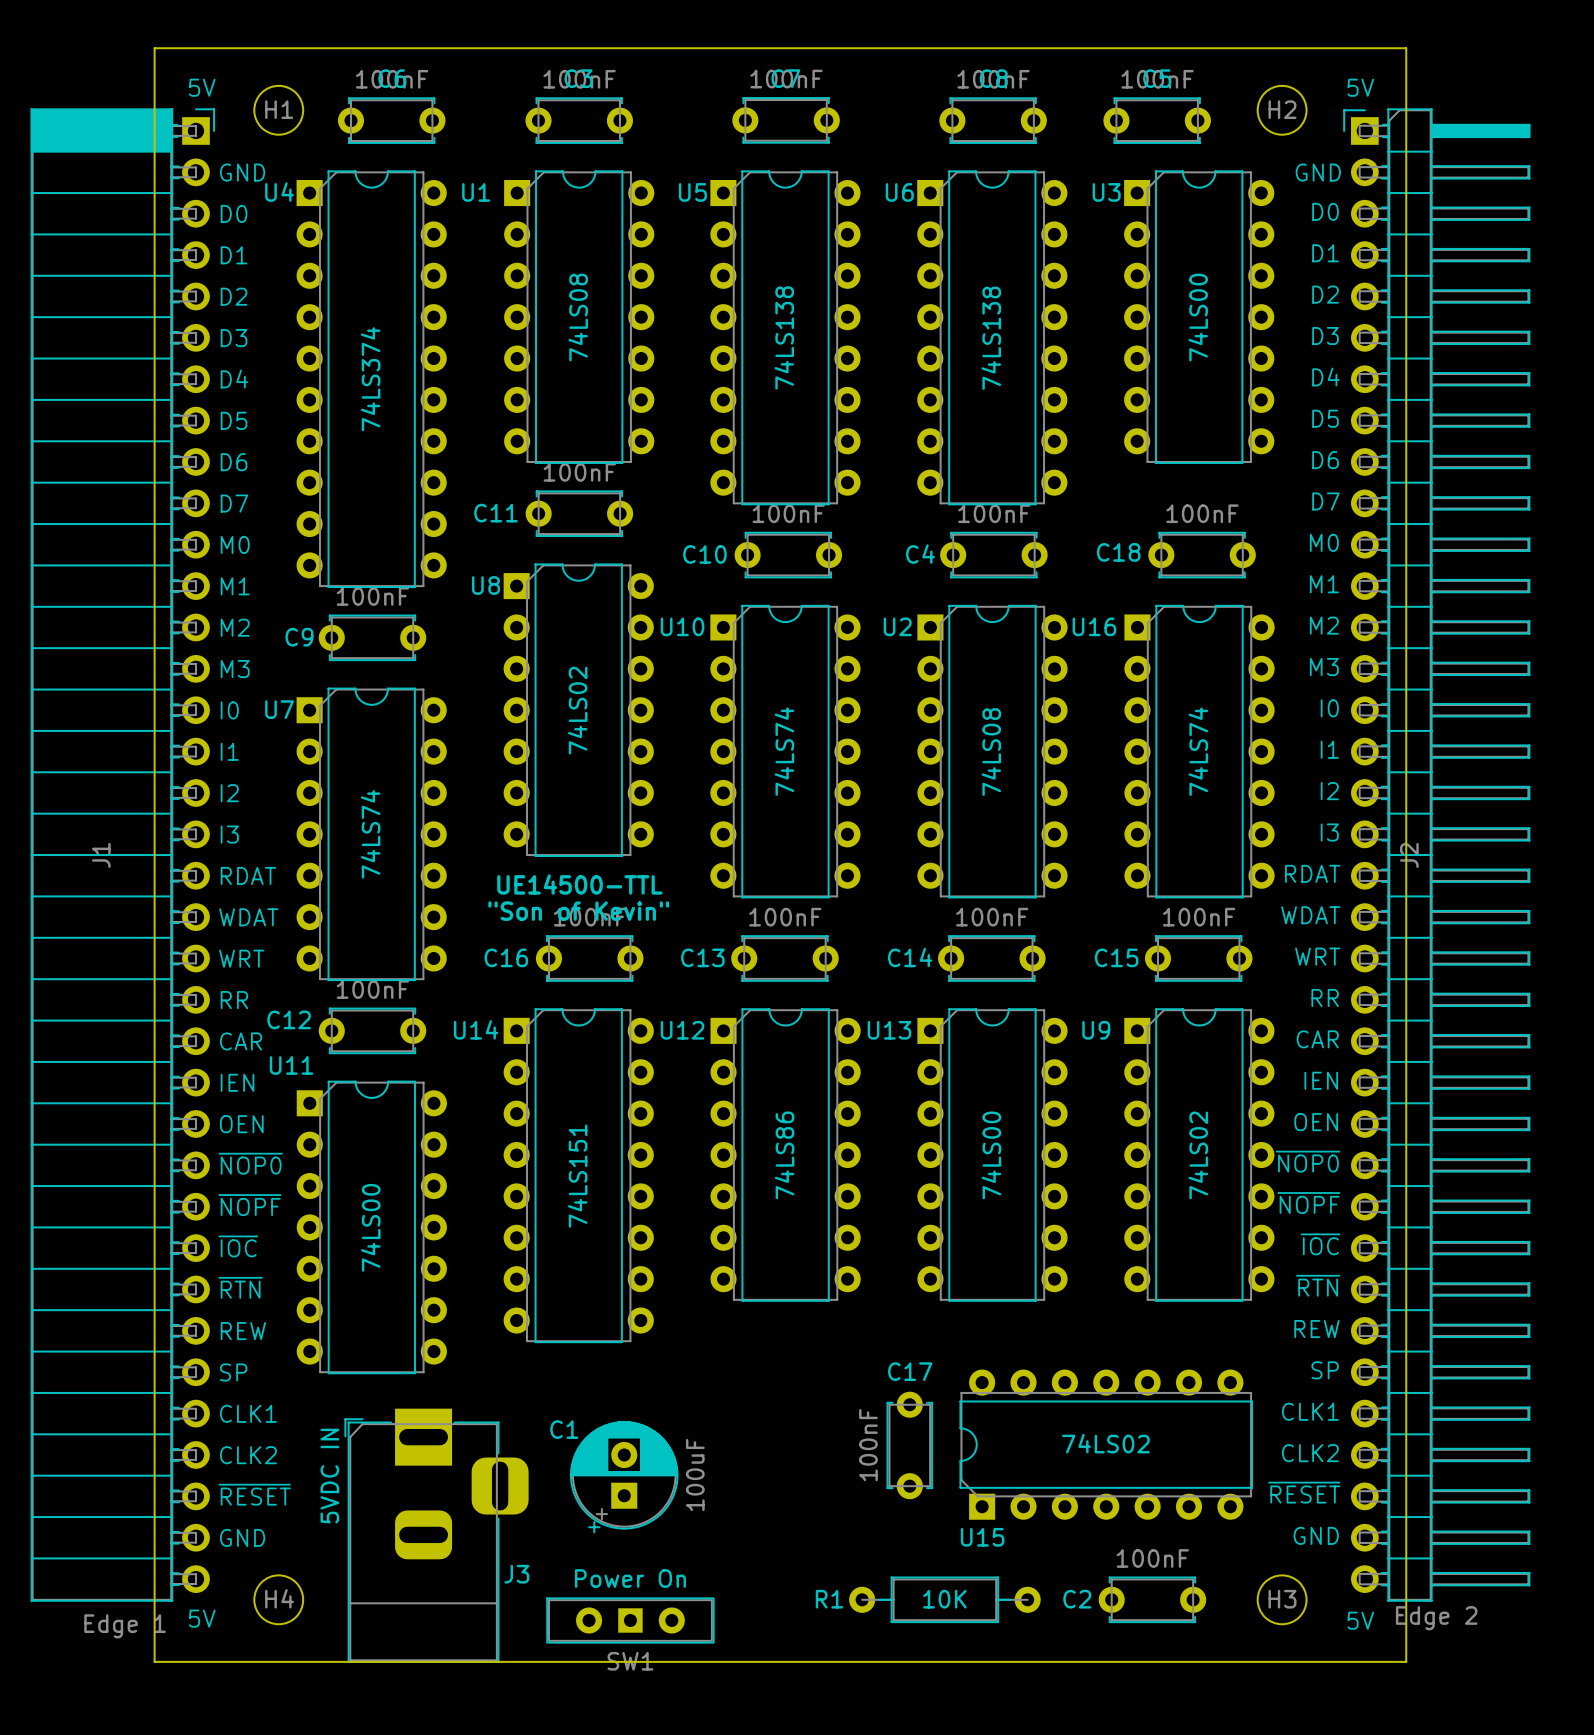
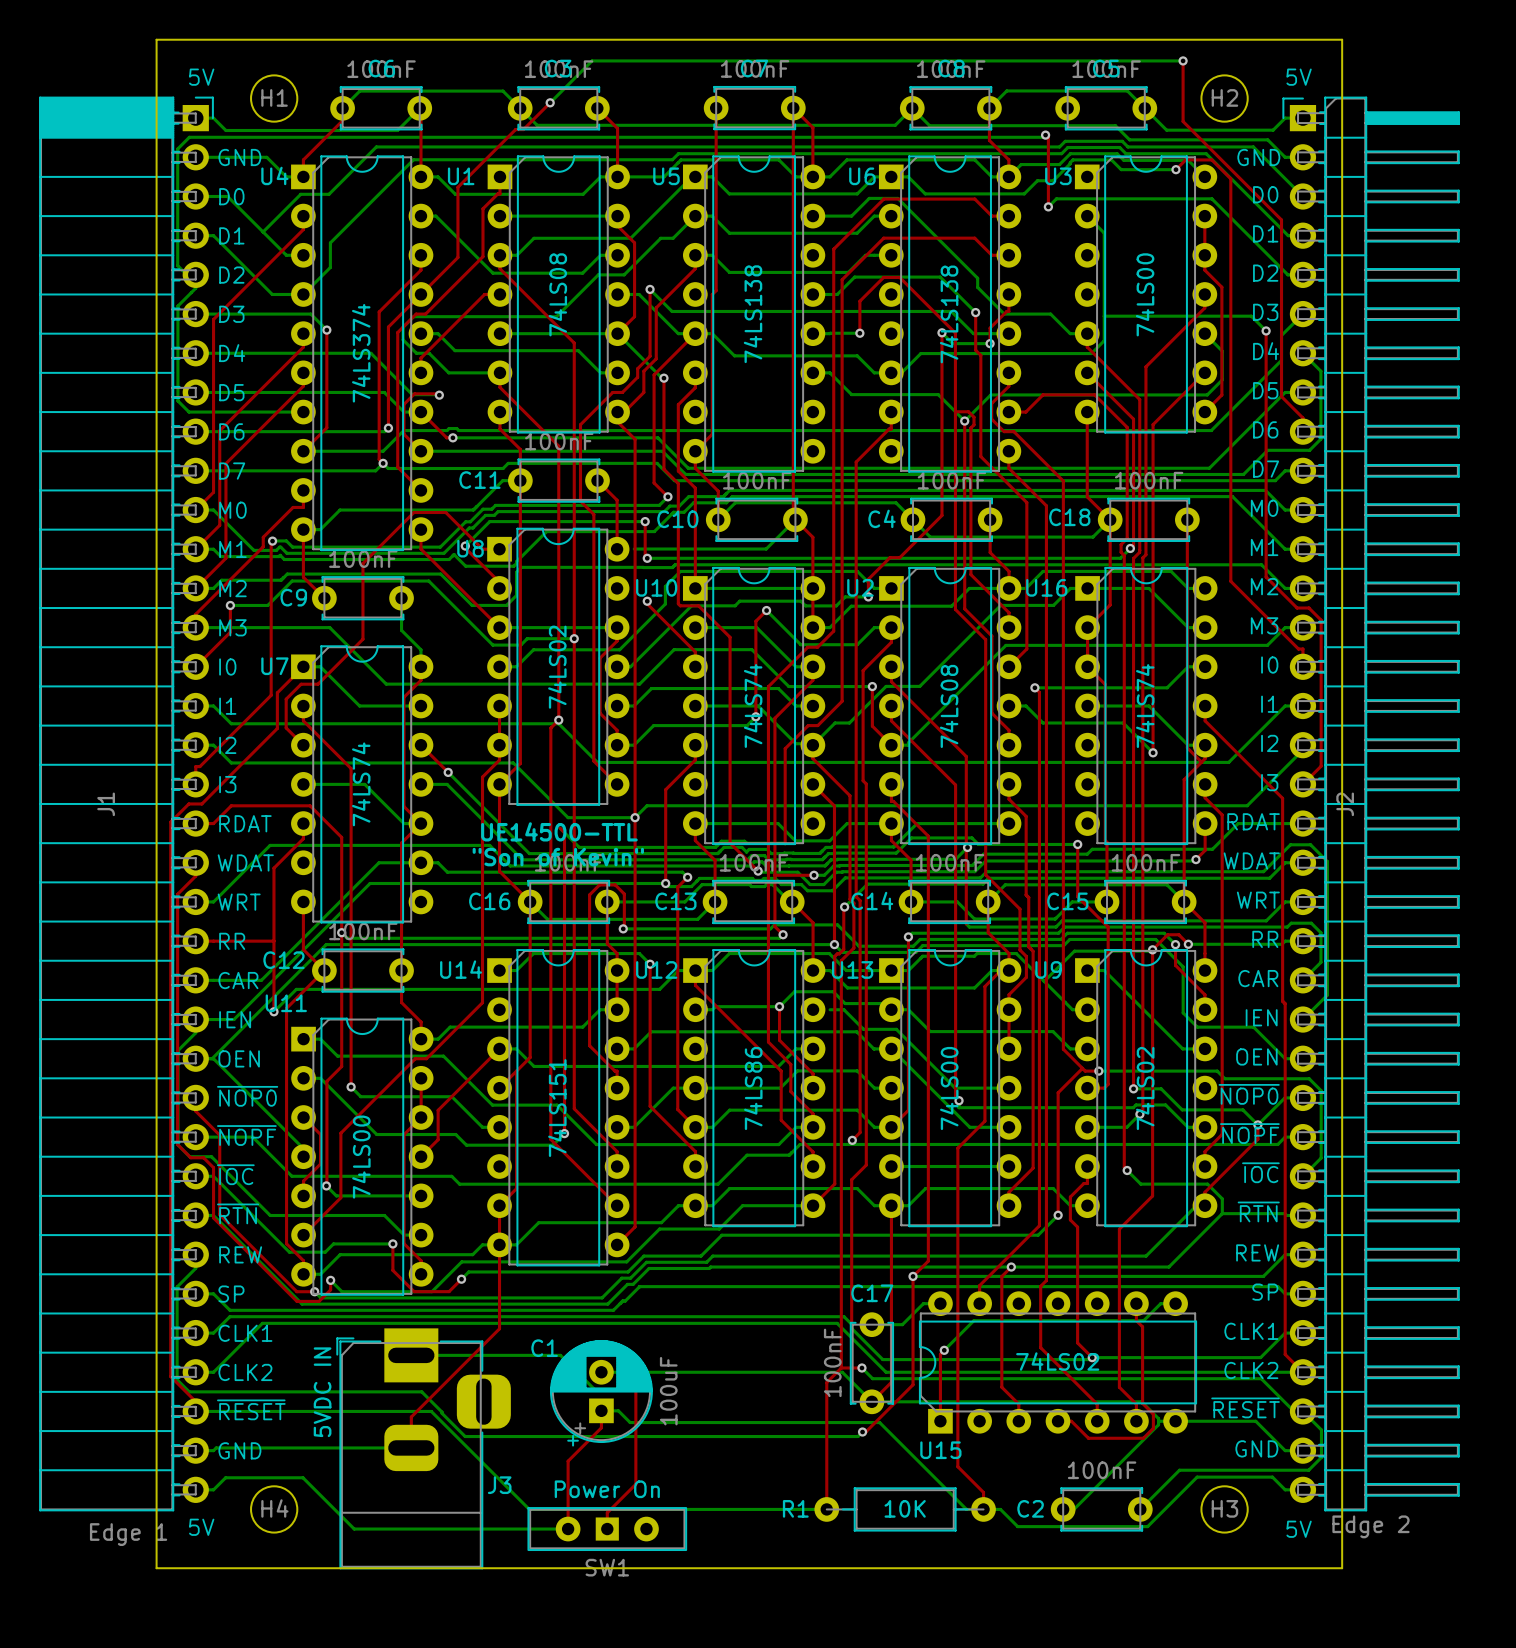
top track: none -> (1183, 60) (1183, 121) (1281, 219) (1281, 396) (1302, 418) (1302, 431)
bottom track: none -> (1183, 60) (592, 60) (550, 102)
via: none -> (1183, 60)
top track: none -> (550, 102) (523, 129) (515, 129) (457, 187) (457, 257) (388, 327) (388, 428)
via: none -> (550, 102)
top track: none -> (342, 108) (342, 120) (303, 159) (303, 176)
bottom track: none -> (342, 108) (359, 91) (502, 91) (537, 125) (895, 125) (912, 108) (929, 125) (1115, 125) (1129, 139) (1267, 139) (1285, 157) (1302, 157)
top track: none -> (419, 108) (420, 176)
bottom track: none -> (419, 108) (397, 130) (225, 130) (213, 118) (195, 118)
top track: none -> (597, 108) (617, 128) (617, 176)
top track: none -> (716, 108) (716, 290) (712, 294) (712, 434) (695, 451) (695, 468) (718, 491) (718, 519)
top track: none -> (989, 108) (989, 140) (1008, 159) (1008, 176)
bottom track: none -> (989, 108) (1006, 90) (1127, 90) (1166, 130) (1273, 130) (1285, 118) (1302, 118)
top track: none -> (1045, 135) (1048, 137) (1048, 206)
bottom track: none -> (1045, 135) (1043, 137) (189, 137) (177, 148) (177, 265) (195, 283)
via: none -> (1045, 135)
bottom track: none -> (195, 157) (266, 157) (286, 176) (303, 176)
top track: none -> (1175, 169) (1185, 159) (1211, 159) (1230, 178) (1230, 581) (1298, 649) (1302, 649) (1302, 666)
bottom track: none -> (1175, 169) (1121, 169) (1111, 159) (1072, 159) (1053, 180) (1037, 180) (1024, 193) (925, 193) (908, 176) (874, 176) (857, 193) (729, 193) (712, 176) (692, 176) (630, 238) (533, 238) (516, 255) (499, 255)
via: none -> (1175, 169)
bottom track: none -> (420, 176) (437, 176) (455, 194) (583, 194) (600, 176) (664, 176) (681, 159) (778, 159) (795, 176) (829, 176) (846, 159) (974, 159) (991, 176) (1008, 176) (1021, 164) (1059, 164) (1070, 153) (1117, 153) (1123, 160) (1188, 160) (1204, 176)
top track: none -> (499, 176) (499, 193) (482, 208) (482, 256) (425, 314) (416, 314) (397, 332) (397, 467) (420, 490)
top track: none -> (812, 176) (812, 127) (793, 108) (793, 517) (812, 537) (812, 627)
bottom track: none -> (195, 196) (227, 196) (286, 255) (303, 255)
bottom track: none -> (1302, 196) (1253, 146) (1127, 146) (1122, 141) (1065, 141) (1059, 146) (376, 146) (329, 194) (300, 194) (263, 231)
bottom track: none -> (1048, 206) (1056, 198) (1211, 198) (1287, 274) (1302, 274)
via: none -> (1048, 206)
top track: none -> (303, 216) (303, 229) (213, 319) (213, 492) (195, 510)
bottom track: none -> (420, 216) (435, 216) (492, 273) (582, 273) (600, 255) (617, 255)
bottom track: none -> (499, 216) (617, 216)
top track: none -> (617, 216) (617, 225) (634, 242) (634, 316) (617, 333)
bottom track: none -> (812, 216) (851, 216) (869, 198) (897, 198) (977, 278) (977, 287) (1004, 314) (1050, 314) (1070, 333) (1087, 333)
bottom track: none -> (891, 216) (874, 216) (857, 233) (729, 233) (712, 216) (695, 216) (673, 238) (660, 238) (624, 274) (598, 274) (556, 316) (413, 316) (403, 327) (403, 339) (416, 353) (429, 353) (448, 372) (499, 372)
top track: none -> (1008, 216) (991, 216) (974, 199) (883, 199) (833, 249) (833, 631) (817, 647) (807, 647) (768, 686) (768, 1042) (790, 1064) (790, 1091) (813, 1113) (813, 1127)
bottom track: none -> (1087, 216) (1104, 233) (1104, 340) (1091, 353) (920, 353) (901, 372) (874, 372) (857, 355) (734, 355) (712, 333) (678, 333) (639, 294) (617, 294)
top track: none -> (1204, 216) (1204, 270) (1221, 287) (1221, 395) (1204, 412)
bottom track: none -> (195, 235) (213, 235) (272, 294) (303, 294) (330, 267) (330, 242) (413, 159) (672, 159) (678, 153) (1061, 153) (1067, 147) (1119, 147) (1125, 153) (1206, 153) (1288, 235) (1302, 235)
top track: none -> (420, 255) (420, 270) (379, 311) (379, 459) (383, 463)
top track: none -> (499, 255) (499, 268) (574, 343) (574, 1108) (617, 1151) (617, 1166)
top track: none -> (695, 255) (695, 268) (656, 307) (656, 358) (643, 371) (643, 392) (624, 412) (617, 412) (617, 421) (635, 439) (635, 1226) (617, 1244)
bottom track: none -> (695, 255) (712, 255) (729, 272) (848, 272) (865, 255) (891, 255)
top track: none -> (1008, 255) (991, 255) (974, 238) (883, 238) (842, 279) (842, 701) (817, 725) (808, 725) (785, 748) (785, 843)
bottom track: none -> (195, 274) (195, 288) (177, 306) (177, 400) (189, 412) (303, 412)
top track: none -> (650, 289) (650, 356) (637, 368) (637, 377) (622, 392) (612, 392) (580, 424) (580, 501) (593, 514) (593, 761) (617, 784)
bottom track: none -> (650, 289) (672, 311) (951, 311) (973, 333) (1008, 333)
via: none -> (650, 289)
top track: none -> (499, 294) (484, 294) (420, 358) (420, 372)
bottom track: none -> (812, 294) (837, 294) (854, 277) (940, 277) (975, 312)
top track: none -> (1008, 294) (1008, 311) (990, 328) (990, 343)
top track: none -> (1204, 294) (1204, 307) (1145, 366) (1145, 554) (1142, 557) (1142, 1111) (1139, 1114)
top track: none -> (975, 312) (975, 350) (980, 355) (980, 456) (1026, 502) (1026, 648) (1009, 666)
via: none -> (975, 312)
bottom track: none -> (195, 314) (310, 314) (326, 330)
bottom track: none -> (1302, 314) (1281, 335) (1281, 360) (1211, 430) (458, 430) (456, 428) (449, 428) (447, 430) (403, 430) (383, 451) (303, 451)
bottom track: none -> (1104, 316) (1251, 316) (1266, 330)
top track: none -> (326, 330) (326, 427) (303, 451)
via: none -> (326, 330)
top track: none -> (1266, 330) (1266, 577) (1297, 608) (1308, 608) (1321, 620) (1321, 766) (1302, 784)
via: none -> (1266, 330)
top track: none -> (941, 332) (941, 515) (899, 557) (890, 557) (868, 579) (868, 596)
bottom track: none -> (941, 332) (952, 343) (990, 343)
via: none -> (941, 332)
top track: none -> (303, 333) (303, 347) (219, 430) (219, 525) (195, 549)
bottom track: none -> (420, 333) (437, 333) (454, 350) (578, 350) (600, 372) (617, 372)
bottom track: none -> (499, 333) (617, 333) (663, 378)
top track: none -> (695, 333) (654, 374) (654, 482) (667, 496)
top track: none -> (859, 333) (859, 301) (883, 277) (899, 277) (955, 333) (955, 609) (985, 639) (985, 874) (1019, 909) (1019, 950) (1026, 956) (1026, 977) (1009, 994) (1009, 1048)
bottom track: none -> (859, 333) (812, 333)
via: none -> (859, 333)
top track: none -> (1087, 333) (1087, 347) (1139, 399) (1139, 550)
bottom track: none -> (1204, 333) (1222, 351) (1222, 379) (1207, 394) (990, 394) (964, 421) (938, 394) (851, 394) (829, 372) (812, 372)
via: none -> (990, 343)
bottom track: none -> (195, 353) (370, 353) (412, 394) (439, 395)
bottom track: none -> (1302, 353) (1320, 371) (1320, 439) (1309, 450) (1267, 450) (1243, 474) (685, 474) (662, 451) (420, 451)
top track: none -> (303, 372) (303, 386) (225, 463) (225, 558) (195, 588)
top track: none -> (499, 372) (499, 387) (558, 446) (558, 720) (550, 728) (550, 1139) (617, 1205)
top track: none -> (695, 372) (695, 387) (678, 404) (678, 471) (695, 488) (695, 588)
top track: none -> (1008, 372) (1008, 386) (991, 403) (991, 419) (1004, 431) (1013, 431) (1063, 481) (1063, 1049) (1085, 1071) (1098, 1071)
top track: none -> (1087, 372) (1133, 419) (1133, 545) (1130, 548)
top track: none -> (1204, 372) (1153, 424) (1153, 752)
top track: none -> (663, 378) (663, 469) (678, 483) (678, 603) (680, 605) (698, 605) (730, 637) (730, 843) (758, 871)
via: none -> (663, 378)
bottom track: none -> (195, 392) (384, 392) (403, 412) (420, 412)
bottom track: none -> (1302, 392) (1285, 392) (1209, 468) (688, 468) (657, 437) (452, 437)
top track: none -> (439, 395) (414, 393) (403, 404) (403, 434) (420, 451)
via: none -> (439, 395)
top track: none -> (955, 411) (968, 411) (974, 417) (974, 424) (970, 427) (970, 574) (1009, 612) (1009, 627)
top track: none -> (420, 412) (446, 437) (452, 437)
top track: none -> (499, 412) (499, 429) (520, 449) (520, 763) (499, 784) (499, 871) (530, 901) (530, 1057) (499, 1088)
top track: none -> (891, 412) (891, 429) (856, 462) (856, 896) (860, 900) (860, 1132) (852, 1140)
top track: none -> (1008, 412) (1025, 412) (1043, 394) (1094, 394) (1127, 427) (1127, 538) (1121, 544) (1121, 552) (1124, 555) (1124, 1167) (1127, 1170)
top track: none -> (1087, 412) (1087, 496) (1110, 519) (1110, 604) (1087, 627) (1087, 666) (1105, 684) (1107, 901)
top track: none -> (964, 421) (964, 608) (991, 636) (991, 713) (1009, 730) (1009, 745)
via: none -> (964, 421)
bottom track: none -> (388, 428) (384, 431) (195, 431)
via: none -> (388, 428)
via: none -> (452, 437)
top track: none -> (1008, 451) (1008, 468) (1046, 505) (1046, 1280) (1040, 1286) (1040, 1347) (1097, 1404) (1097, 1421)
via: none -> (383, 463)
bottom track: none -> (195, 470) (375, 470) (383, 463) (388, 468) (503, 468) (508, 463) (657, 463) (674, 480) (1275, 480) (1285, 470) (1302, 470)
bottom track: none -> (520, 480) (502, 480) (473, 510) (340, 510) (320, 529) (303, 529)
top track: none -> (597, 480) (617, 500) (617, 549)
top track: none -> (303, 490) (303, 507) (293, 507) (263, 537) (263, 546) (195, 614) (195, 627)
bottom track: none -> (667, 496) (659, 505) (495, 505) (491, 509) (483, 509) (470, 521) (465, 521) (440, 547) (292, 547) (286, 540) (272, 540)
via: none -> (667, 496)
bottom track: none -> (195, 510) (213, 510) (253, 550) (276, 550) (280, 547) (286, 553) (443, 553) (469, 528) (472, 528) (485, 515) (494, 515) (498, 511) (664, 511) (669, 506) (679, 506) (688, 496) (723, 496) (729, 490) (1265, 490) (1285, 510) (1302, 510)
bottom track: none -> (718, 519) (735, 502) (895, 502) (930, 537) (1092, 537) (1110, 519)
bottom track: none -> (795, 519) (766, 549) (634, 549)
top track: none -> (990, 519) (990, 552) (1009, 571) (1009, 588)
top track: none -> (1187, 519) (1187, 747) (1201, 762)
top track: none -> (645, 521) (645, 556) (647, 558)
bottom track: none -> (645, 521) (489, 521) (465, 546)
via: none -> (645, 521)
top track: none -> (303, 529) (303, 577) (324, 598)
top track: none -> (420, 529) (420, 549) (499, 627)
top track: none -> (272, 541) (271, 695) (199, 766) (195, 766) (195, 784)
via: none -> (272, 541)
top track: none -> (465, 546) (499, 582) (499, 588)
via: none -> (465, 546)
bottom track: none -> (1130, 548) (1120, 558) (647, 558)
via: none -> (1130, 548)
bottom track: none -> (195, 549) (213, 549) (220, 556) (280, 555) (284, 559) (449, 559) (454, 554) (465, 566) (513, 566) (546, 531) (654, 531) (673, 512) (684, 512) (693, 502) (726, 502) (732, 496) (1232, 496) (1285, 549) (1302, 549)
top track: none -> (499, 549) (482, 549) (445, 512) (413, 512) (362, 563) (362, 639) (317, 684) (301, 684) (286, 699) (286, 727) (303, 745)
top track: none -> (1139, 550) (1133, 558) (1133, 1088)
via: none -> (647, 558)
bottom track: none -> (643, 567) (521, 567) (516, 572) (516, 595) (506, 605) (472, 605) (440, 574) (287, 574) (281, 580) (221, 580) (213, 588) (195, 588)
bottom track: none -> (643, 567) (672, 567) (675, 564) (1261, 564) (1285, 588) (1302, 588)
bottom track: none -> (695, 588) (812, 588)
bottom track: none -> (891, 588) (874, 588) (857, 571) (680, 571) (665, 586) (665, 604) (619, 649) (533, 649) (516, 666) (499, 666)
bottom track: none -> (1205, 588) (1188, 588) (1171, 571) (1043, 571) (1026, 588) (969, 588) (951, 606) (851, 606) (829, 627) (812, 627)
bottom track: none -> (868, 596) (845, 596) (836, 605) (805, 605) (800, 601) (739, 601) (735, 605) (691, 605) (630, 666) (617, 666)
via: none -> (868, 596)
bottom track: none -> (401, 598) (401, 630) (420, 649) (420, 666)
top track: none -> (647, 601) (647, 603) (695, 651) (695, 666)
via: none -> (647, 601)
top track: none -> (230, 605) (230, 632) (195, 666)
bottom track: none -> (230, 605) (267, 605) (292, 581) (428, 581) (492, 645) (520, 645) (527, 638) (574, 638)
via: none -> (230, 605)
top track: none -> (766, 610) (755, 621) (755, 716)
bottom track: none -> (766, 610) (800, 644) (857, 644) (874, 627) (891, 627)
via: none -> (766, 610)
bottom track: none -> (195, 627) (329, 627) (386, 684) (639, 684) (674, 649) (751, 649) (788, 686) (872, 686)
bottom track: none -> (499, 627) (617, 627)
top track: none -> (617, 627) (617, 641) (600, 658) (600, 713) (617, 730) (617, 745)
bottom track: none -> (695, 627) (756, 627) (795, 666) (812, 666)
top track: none -> (891, 627) (891, 642) (863, 670) (863, 780) (866, 783) (866, 1165) (851, 1179) (851, 1324)
bottom track: none -> (1205, 627) (1188, 627) (1148, 588) (1070, 588) (1053, 605) (1000, 605) (919, 686) (886, 686) (849, 723) (835, 723) (812, 745) (795, 743) (758, 706) (695, 706)
bottom track: none -> (1302, 627) (1285, 627) (1267, 645) (1005, 645) (908, 742) (908, 745) (891, 745)
via: none -> (574, 638)
top track: none -> (303, 666) (277, 692) (277, 728) (201, 803) (188, 803) (170, 822) (170, 1376) (195, 1401) (195, 1411)
bottom track: none -> (303, 666) (320, 666) (359, 706) (420, 706)
top track: none -> (420, 666) (420, 680) (403, 697) (403, 806) (420, 823) (401, 843) (401, 1002) (421, 1022) (421, 1039)
top track: none -> (812, 666) (812, 680) (774, 718) (774, 926) (783, 934)
top track: none -> (891, 666) (891, 681) (966, 756) (966, 923)
bottom track: none -> (1205, 666) (1188, 666) (1167, 687) (1034, 687)
top track: none -> (872, 686) (872, 726) (891, 745)
via: none -> (872, 686)
top track: none -> (1034, 687) (1039, 692) (1039, 1225) (979, 1285) (979, 1303)
via: none -> (1034, 687)
bottom track: none -> (195, 706) (213, 706) (231, 723) (558, 723)
top track: none -> (303, 706) (303, 720) (351, 768) (351, 1086)
top track: none -> (499, 706) (499, 760) (482, 777) (482, 1002) (426, 1058) (415, 1058) (340, 1133) (340, 1197) (303, 1235)
bottom track: none -> (617, 706) (634, 706) (651, 688) (778, 688) (795, 706) (812, 706)
top track: none -> (891, 706) (891, 720) (955, 785) (955, 1097) (959, 1100)
bottom track: none -> (1009, 706) (1026, 706) (1043, 723) (1123, 723) (1153, 752)
bottom track: none -> (1087, 706) (1148, 706) (1188, 745) (1205, 745)
top track: none -> (1205, 706) (1205, 720) (1282, 798) (1282, 1001) (1285, 1003) (1285, 1354) (1302, 1372)
bottom track: none -> (1302, 706) (1285, 706) (1228, 762) (597, 762) (558, 723)
bottom track: none -> (755, 716) (747, 725) (653, 725) (634, 745) (617, 745)
via: none -> (755, 716)
via: none -> (558, 720)
bottom track: none -> (195, 745) (213, 745) (231, 762) (513, 762) (568, 817) (635, 817) (647, 805) (1247, 805) (1302, 750) (1302, 745)
top track: none -> (420, 745) (448, 772)
top track: none -> (695, 745) (695, 760) (665, 789) (665, 883)
top track: none -> (812, 745) (812, 758) (849, 795) (849, 899) (853, 903) (853, 948) (841, 960) (841, 1368)
top track: none -> (1205, 745) (1205, 758) (1184, 779) (1184, 901) (1204, 922) (1204, 970)
via: none -> (1153, 752)
bottom track: none -> (448, 772) (529, 853) (717, 853) (724, 847) (741, 847) (746, 852) (749, 849) (767, 849) (771, 853) (819, 853) (826, 847) (893, 846) (917, 823) (1009, 823)
via: none -> (448, 772)
bottom track: none -> (303, 784) (364, 784) (403, 823) (420, 823)
bottom track: none -> (420, 784) (447, 784) (522, 859) (747, 859) (751, 855) (764, 855) (768, 859) (822, 859) (828, 853) (896, 853) (911, 837) (971, 837) (978, 844) (1077, 844)
top track: none -> (812, 784) (834, 805) (834, 944)
top track: none -> (891, 784) (891, 801) (928, 836) (928, 1261) (913, 1276) (913, 1384) (865, 1432) (862, 1432)
top track: none -> (1009, 784) (1009, 799) (1026, 816) (1026, 895) (1028, 897) (1028, 946) (1033, 951) (1033, 1168) (1009, 1192) (1009, 1205)
top track: none -> (1205, 784) (1205, 797) (1222, 814) (1222, 1134) (1204, 1151) (1204, 1166)
via: none -> (635, 817)
top track: none -> (195, 823) (213, 823) (231, 805) (310, 805) (341, 837) (341, 1066) (326, 1081) (326, 1185)
top track: none -> (303, 823) (303, 838) (273, 868) (273, 1011)
top track: none -> (695, 823) (695, 840) (715, 860) (715, 901)
bottom track: none -> (695, 823) (778, 823) (795, 840) (829, 840) (847, 823) (891, 823)
top track: none -> (891, 823) (891, 840) (911, 860) (911, 901)
top track: none -> (1205, 823) (1205, 850) (1195, 859)
bottom track: none -> (1302, 823) (1238, 823) (1212, 849) (1092, 849) (1087, 854) (983, 854) (972, 865) (840, 865) (833, 865) (824, 875) (814, 875)
top track: none -> (560, 828) (564, 832) (564, 1133)
bottom track: none -> (560, 828) (579, 847) (715, 847) (721, 841) (785, 843)
top track: none -> (1077, 844) (1077, 896) (1108, 927) (1108, 1084) (1104, 1088) (1087, 1088)
via: none -> (1077, 844)
bottom track: none -> (967, 847) (955, 859) (837, 859) (831, 859) (825, 865) (789, 865)
via: none -> (967, 847)
bottom track: none -> (1195, 859) (985, 860) (974, 871) (836, 872) (823, 884) (810, 884) (797, 872) (758, 871)
via: none -> (1195, 859)
top track: none -> (195, 862) (195, 876) (177, 894) (177, 1144) (190, 1157) (203, 1157) (213, 1167) (213, 1217) (296, 1301) (319, 1301) (330, 1289) (330, 1280)
bottom track: none -> (1302, 862) (1285, 862) (1269, 878) (988, 878) (983, 884) (867, 884) (844, 907)
bottom track: none -> (788, 865) (766, 865) (761, 861) (754, 861) (750, 865) (510, 865) (489, 845) (270, 845) (213, 901) (195, 901)
via: none -> (758, 871)
top track: none -> (774, 875) (814, 875)
via: none -> (814, 875)
top track: none -> (687, 877) (677, 887) (677, 1109) (695, 1127)
bottom track: none -> (687, 877) (682, 872) (447, 872) (437, 862) (378, 862) (261, 980) (195, 980)
via: none -> (687, 877)
via: none -> (665, 883)
top track: none -> (303, 901) (303, 949) (324, 970) (286, 1008) (286, 1243) (303, 1260) (303, 1274)
bottom track: none -> (530, 901) (547, 919) (697, 919) (715, 901)
top track: none -> (607, 901) (607, 943) (617, 953) (617, 1009)
bottom track: none -> (607, 901) (684, 901) (702, 884) (749, 884) (751, 886) (772, 884) (792, 901)
top track: none -> (792, 901) (813, 922) (813, 970)
bottom track: none -> (911, 901) (957, 901) (974, 919) (1055, 919) (1072, 901) (1107, 901)
top track: none -> (988, 901) (988, 932) (1009, 953) (1009, 970)
bottom track: none -> (988, 901) (1005, 884) (1167, 884) (1184, 901)
bottom track: none -> (1302, 901) (1285, 901) (1266, 920) (1062, 920) (1055, 927) (969, 927) (966, 923)
top track: none -> (844, 907) (843, 949) (834, 956) (834, 1183) (813, 1205)
via: none -> (844, 907)
top track: none -> (623, 928) (624, 894) (615, 884) (599, 884) (589, 894) (589, 1045) (617, 1071) (617, 1088)
bottom track: none -> (623, 928) (770, 928) (774, 924) (837, 924) (858, 946) (913, 946) (920, 939) (1061, 939) (1067, 933) (1164, 933) (1175, 944)
via: none -> (623, 928)
bottom track: none -> (341, 932) (347, 938) (779, 938) (783, 934)
via: none -> (341, 932)
via: none -> (783, 934)
top track: none -> (908, 936) (908, 1110) (891, 1127)
bottom track: none -> (908, 936) (912, 933) (1058, 933) (1064, 927) (1287, 927) (1291, 923) (1311, 923) (1320, 932) (1320, 962) (1302, 980)
via: none -> (908, 936)
top track: none -> (195, 941) (273, 941)
bottom track: none -> (1302, 941) (1285, 941) (1282, 944) (1188, 944)
via: none -> (834, 944)
top track: none -> (1175, 944) (1175, 965) (1204, 994) (1204, 1009)
via: none -> (1175, 944)
top track: none -> (1188, 944) (1178, 934) (1167, 934) (1152, 949) (1152, 1195) (1119, 1229) (1119, 1387) (1136, 1404) (1136, 1421)
via: none -> (1188, 944)
bottom track: none -> (1152, 949) (1074, 951) (1044, 981)
via: none -> (1152, 949)
top track: none -> (1009, 962) (984, 986) (984, 1121) (957, 1148) (957, 1466) (983, 1492) (983, 1509)
top track: none -> (650, 964) (650, 1106) (695, 1151) (695, 1166)
bottom track: none -> (650, 964) (639, 953) (533, 953) (516, 970) (499, 970)
via: none -> (650, 964)
top track: none -> (695, 970) (695, 985) (781, 1071) (781, 1120) (813, 1152) (813, 1166)
bottom track: none -> (813, 970) (830, 970) (847, 987) (974, 987) (992, 970) (1009, 970)
bottom track: none -> (1087, 970) (1104, 970) (1182, 1048) (1204, 1048)
bottom track: none -> (1044, 981) (1072, 1009) (1087, 1009)
bottom track: none -> (1044, 981) (1016, 953) (922, 956) (908, 970) (846, 970) (829, 953) (729, 953) (712, 970) (678, 970) (659, 989) (296, 989) (273, 1011)
top track: none -> (779, 1006) (779, 1040) (813, 1073) (813, 1088)
via: none -> (779, 1006)
bottom track: none -> (617, 1009) (600, 1009) (582, 1027) (450, 1027) (438, 1039) (421, 1039)
bottom track: none -> (695, 1009) (712, 1009) (715, 1006) (779, 1006) (794, 991) (833, 991) (845, 1003) (893, 1003) (899, 1009)
bottom track: none -> (830, 1009) (844, 1009) (863, 1029) (896, 1029) (955, 1088) (1009, 1088)
bottom track: none -> (891, 1009) (908, 1009) (930, 1031) (1053, 1031) (1070, 1048) (1087, 1048)
via: none -> (273, 1011)
bottom track: none -> (1302, 1019) (1327, 995) (1327, 861) (1310, 844) (1290, 844) (1263, 871) (986, 871) (980, 877) (845, 877) (832, 890) (807, 890) (801, 884) (781, 884) (775, 878) (754, 880) (752, 878) (699, 878) (691, 886) (668, 886) (665, 883) (370, 883) (234, 1019) (195, 1019) (195, 1032) (178, 1050) (178, 1145) (189, 1156) (211, 1156) (270, 1215) (384, 1215) (404, 1235) (421, 1235)
bottom track: none -> (303, 1039) (320, 1039) (337, 1056) (443, 1056) (492, 1105) (557, 1105) (596, 1144) (778, 1144) (796, 1127) (813, 1127)
top track: none -> (499, 1048) (438, 1110) (438, 1139) (421, 1156)
bottom track: none -> (499, 1048) (516, 1048) (534, 1066) (778, 1066) (796, 1048) (813, 1048)
bottom track: none -> (617, 1048) (634, 1048) (651, 1031) (856, 1031) (873, 1048) (891, 1048) (969, 1127) (1009, 1127)
bottom track: none -> (195, 1058) (213, 1058) (303, 1148) (303, 1156)
bottom track: none -> (212, 1058) (326, 944) (834, 944) (842, 952) (915, 952) (922, 945) (1063, 945) (1069, 939) (1155, 939) (1183, 966) (1183, 1012) (1197, 1027) (1253, 1027) (1285, 1058) (1302, 1058)
top track: none -> (1082, 1068) (1058, 1092) (1058, 1215)
top track: none -> (516, 1071) (516, 1188) (499, 1205) (499, 1328) (411, 1416) (411, 1447)
bottom track: none -> (1098, 1071) (1217, 1071) (1224, 1078) (1309, 1078) (1321, 1090) (1321, 1158) (1302, 1176)
via: none -> (1098, 1071)
bottom track: none -> (303, 1078) (320, 1078) (376, 1134) (455, 1134) (466, 1145) (552, 1145) (564, 1133)
top track: none -> (421, 1078) (421, 1117) (403, 1134) (403, 1243) (421, 1260) (421, 1274)
bottom track: none -> (351, 1086) (360, 1096) (451, 1096) (482, 1127) (499, 1127)
via: none -> (351, 1086)
bottom track: none -> (891, 1088) (874, 1088) (857, 1070) (797, 1070) (780, 1088) (673, 1088) (634, 1127) (617, 1127)
bottom track: none -> (1133, 1088) (1161, 1088) (1182, 1109) (1242, 1109) (1257, 1124) (1284, 1097) (1302, 1097)
via: none -> (1133, 1088)
top track: none -> (195, 1097) (195, 1111) (219, 1135) (219, 1214) (296, 1291) (314, 1291)
bottom track: none -> (959, 1100) (959, 1107) (1133, 1107) (1136, 1104) (1165, 1104) (1187, 1127) (1204, 1127)
via: none -> (959, 1100)
bottom track: none -> (1139, 1114) (1126, 1127) (1087, 1127)
via: none -> (1139, 1114)
top track: none -> (303, 1117) (320, 1134) (320, 1164) (303, 1181) (303, 1195)
top track: none -> (1257, 1124) (1257, 1139) (1204, 1192) (1204, 1205)
via: none -> (1257, 1124)
bottom track: none -> (695, 1127) (712, 1127) (729, 1110) (857, 1110) (874, 1127) (891, 1127)
via: none -> (564, 1133)
bottom track: none -> (195, 1137) (252, 1137) (291, 1176) (451, 1176) (459, 1184) (718, 1184) (747, 1155) (789, 1155) (800, 1144) (1277, 1144) (1285, 1137) (1302, 1137)
via: none -> (852, 1140)
bottom track: none -> (891, 1166) (1009, 1166)
top track: none -> (1087, 1166) (1087, 1183) (1083, 1183) (1070, 1197) (1070, 1219) (1077, 1227) (1077, 1342) (1092, 1357)
bottom track: none -> (1127, 1170) (1140, 1184) (1207, 1184) (1222, 1198) (1222, 1213)
via: none -> (1127, 1170)
bottom track: none -> (195, 1176) (213, 1176) (289, 1252) (325, 1252) (333, 1243) (392, 1243)
bottom track: none -> (326, 1185) (336, 1195) (421, 1195)
via: none -> (326, 1185)
bottom track: none -> (813, 1205) (742, 1205) (719, 1229) (659, 1229) (626, 1261) (461, 1261) (431, 1291) (342, 1291) (330, 1280)
top track: none -> (891, 1205) (891, 1382) (871, 1401)
bottom track: none -> (1087, 1205) (1070, 1205) (1053, 1188) (925, 1188) (908, 1205) (874, 1205) (857, 1188) (729, 1188) (712, 1205) (678, 1205) (661, 1222) (538, 1222) (516, 1244) (482, 1244) (472, 1254) (340, 1254) (320, 1274) (303, 1274)
bottom track: none -> (1204, 1205) (1196, 1205) (1146, 1256) (712, 1256) (706, 1262) (646, 1262) (630, 1278) (621, 1278) (602, 1297) (320, 1297) (314, 1291)
bottom track: none -> (1222, 1213) (1302, 1215)
bottom track: none -> (1222, 1213) (1168, 1267) (649, 1268) (633, 1284) (627, 1284) (607, 1304) (302, 1304) (213, 1215) (195, 1215)
bottom track: none -> (1058, 1215) (1038, 1235) (721, 1235) (701, 1256) (643, 1256) (628, 1271) (468, 1271) (461, 1279)
via: none -> (1058, 1215)
top track: none -> (392, 1243) (392, 1270) (414, 1291) (449, 1291) (461, 1279)
via: none -> (392, 1243)
bottom track: none -> (195, 1254) (195, 1268) (177, 1286) (177, 1379) (189, 1391) (421, 1391) (465, 1436) (858, 1436) (862, 1432)
bottom track: none -> (1302, 1254) (1285, 1254) (1263, 1276) (913, 1276)
top track: none -> (1011, 1267) (1001, 1276) (1001, 1387) (1018, 1404) (1018, 1421)
via: none -> (1011, 1267)
via: none -> (913, 1276)
via: none -> (461, 1279)
via: none -> (330, 1280)
via: none -> (314, 1291)
bottom track: none -> (195, 1293) (213, 1293) (229, 1310) (613, 1310) (639, 1286) (1277, 1286) (1285, 1293) (1302, 1293)
bottom track: none -> (940, 1303) (923, 1303) (902, 1324) (871, 1324)
top track: none -> (1136, 1303) (1136, 1320) (1142, 1326) (1142, 1403) (1153, 1414) (1153, 1428) (1143, 1438) (1088, 1438) (1071, 1421) (1058, 1421)
bottom track: none -> (1175, 1303) (1160, 1303) (1143, 1320) (973, 1320) (944, 1350)
bottom track: none -> (195, 1333) (213, 1333) (229, 1316) (844, 1316) (851, 1324) (851, 1328) (882, 1359) (1260, 1357) (1285, 1333) (1302, 1333)
top track: none -> (944, 1350) (940, 1354) (940, 1421)
via: none -> (944, 1350)
bottom track: none -> (411, 1355) (560, 1355) (594, 1389) (628, 1389) (635, 1381)
via: none -> (1092, 1357)
top track: none -> (841, 1368) (861, 1368)
top track: none -> (841, 1368) (826, 1382) (826, 1509)
bottom track: none -> (861, 1368) (872, 1378) (1261, 1378) (1302, 1420) (1302, 1411) (1321, 1429) (1321, 1457) (1308, 1470) (1179, 1470) (1140, 1509)
via: none -> (861, 1368)
bottom track: none -> (195, 1372) (213, 1372) (262, 1323) (837, 1323) (886, 1372) (1302, 1372)
bottom track: none -> (601, 1372) (842, 1372) (871, 1401) (1141, 1401) (1158, 1418) (1158, 1424) (1073, 1509) (1063, 1509)
top track: none -> (635, 1381) (635, 1484) (607, 1512) (607, 1529)
top track: none -> (601, 1410) (601, 1427) (568, 1461) (568, 1529)
bottom track: none -> (601, 1410) (618, 1410) (630, 1422) (879, 1422) (966, 1509) (1000, 1509) (1017, 1526) (1147, 1526) (1197, 1477) (1272, 1477) (1285, 1489) (1302, 1489)
bottom track: none -> (195, 1411) (431, 1411) (529, 1509) (826, 1509)
bottom track: none -> (1158, 1421) (1255, 1421) (1285, 1450) (1302, 1450)
via: none -> (862, 1432)
bottom track: none -> (411, 1447) (216, 1447) (213, 1450) (195, 1450)
bottom track: none -> (195, 1489) (213, 1489) (225, 1477) (303, 1477) (354, 1529) (568, 1529)

